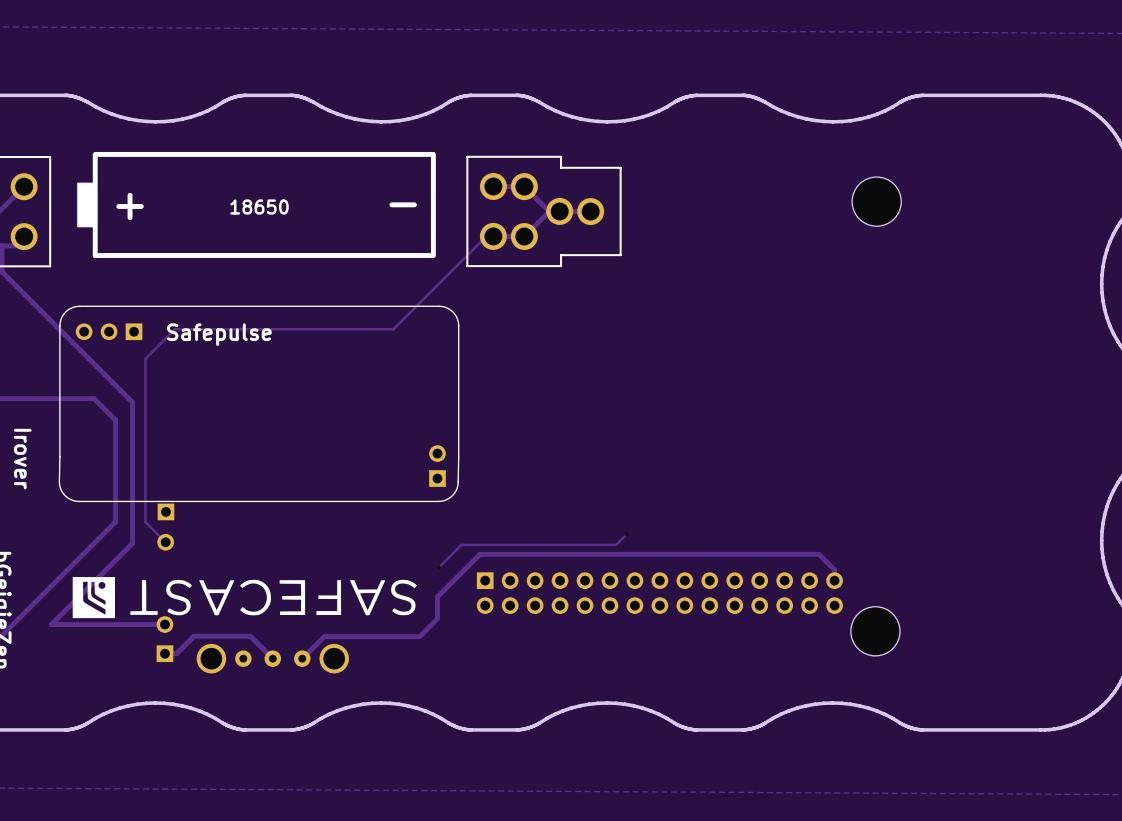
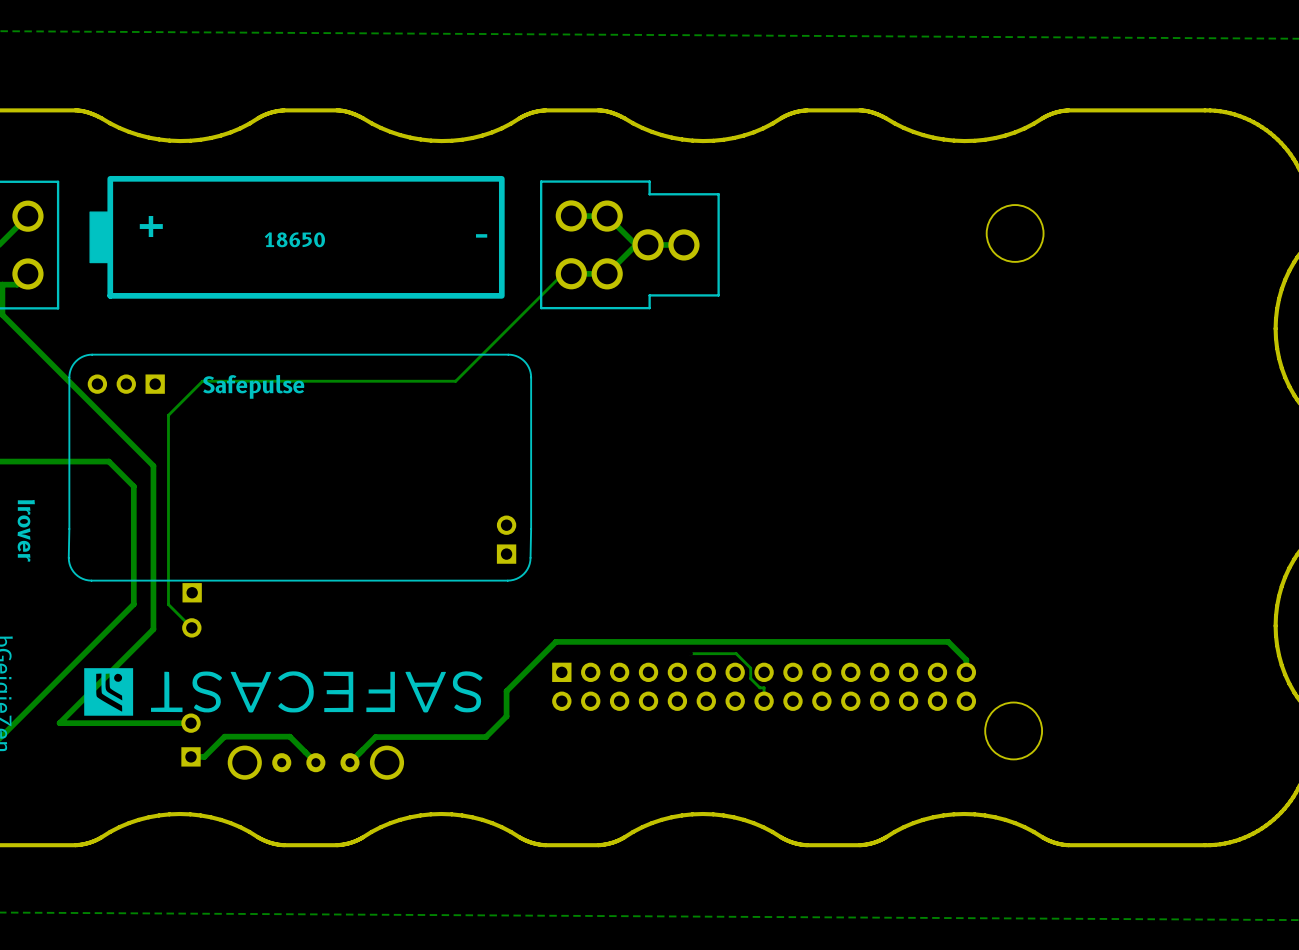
track: (626, 534) (616, 544) (461, 544) (440, 565) -> none
via position: (626, 534) -> (690, 653)
track: none -> (690, 653) (736, 653) (750, 668) (750, 678) (759, 687) (764, 687) (764, 701)
via: (438, 567) -> none

